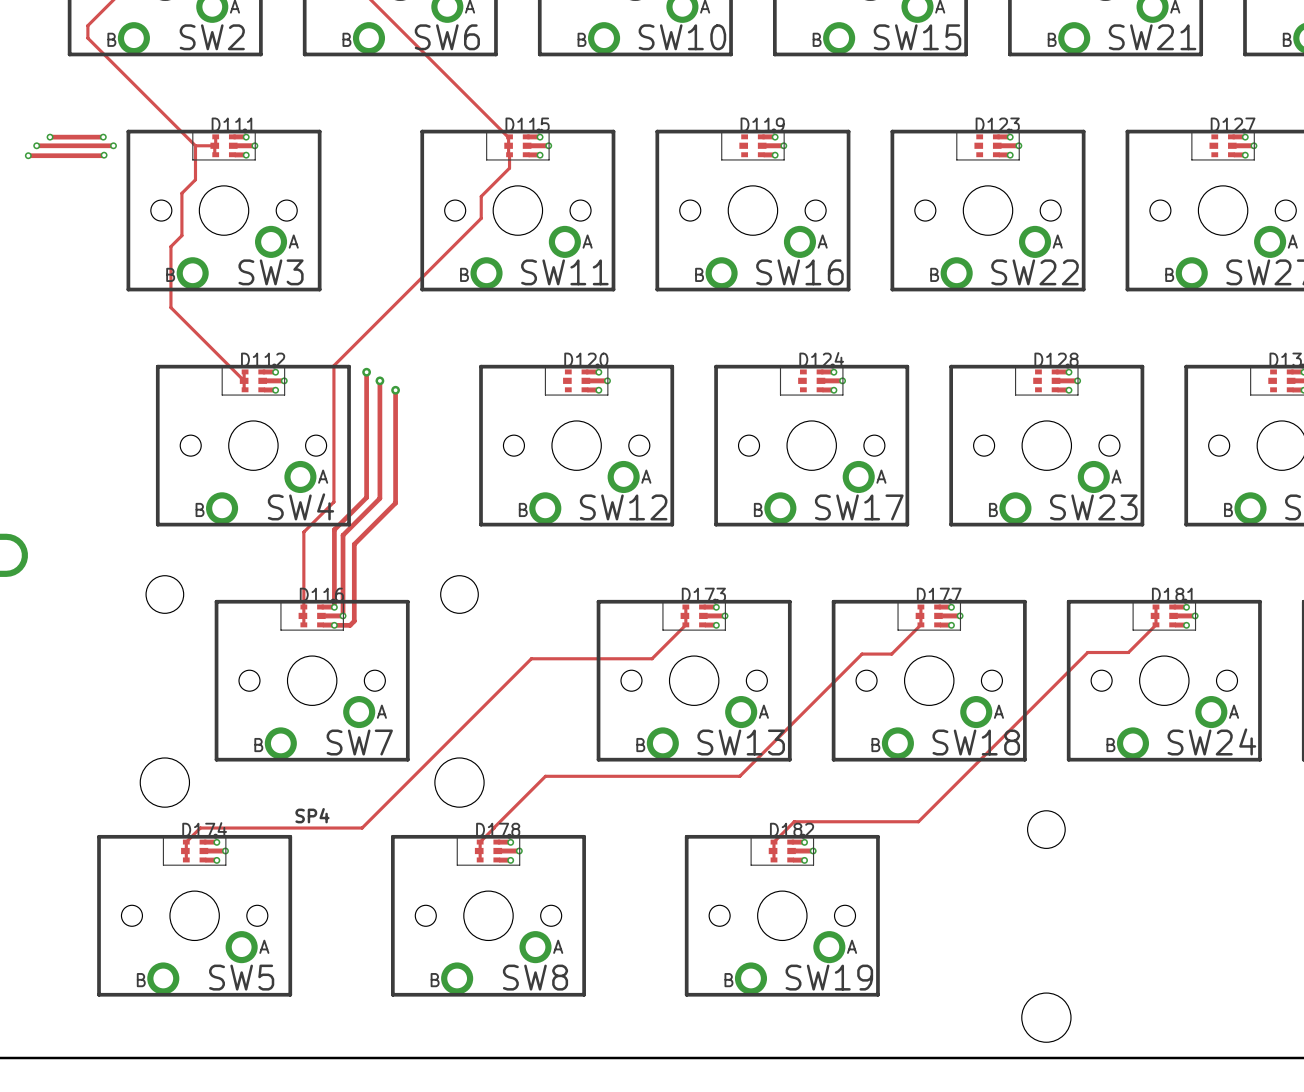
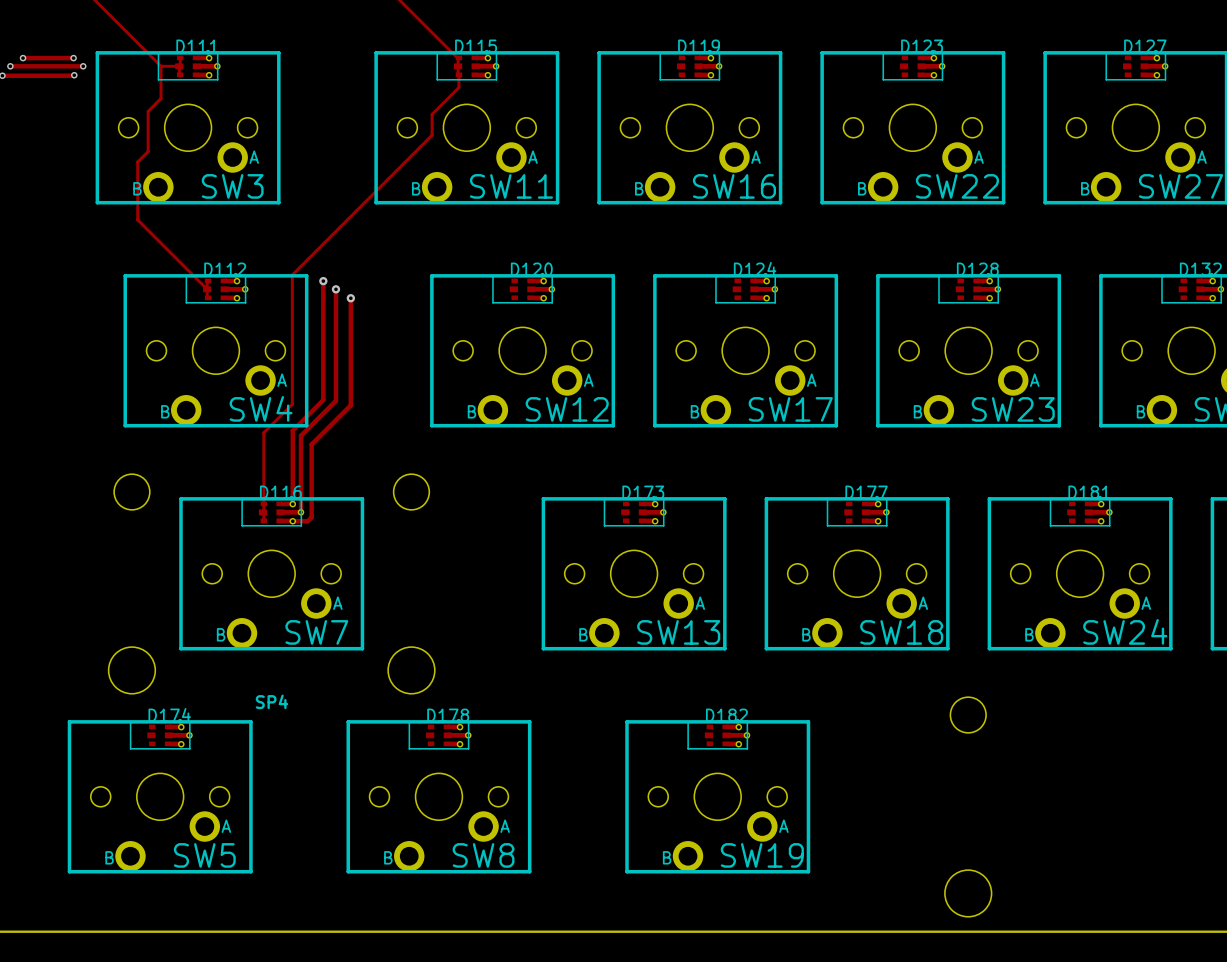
track: (685, 606) (685, 624) (652, 658) (531, 658) (362, 828) (200, 828) (186, 842) (186, 859) -> none
track: (920, 606) (920, 624) (891, 654) (862, 654) (739, 776) (545, 776) (480, 842) (480, 859) -> none
track: (1155, 606) (1155, 624) (1128, 652) (1087, 652) (918, 821) (794, 821) (773, 842) (773, 859) -> none

